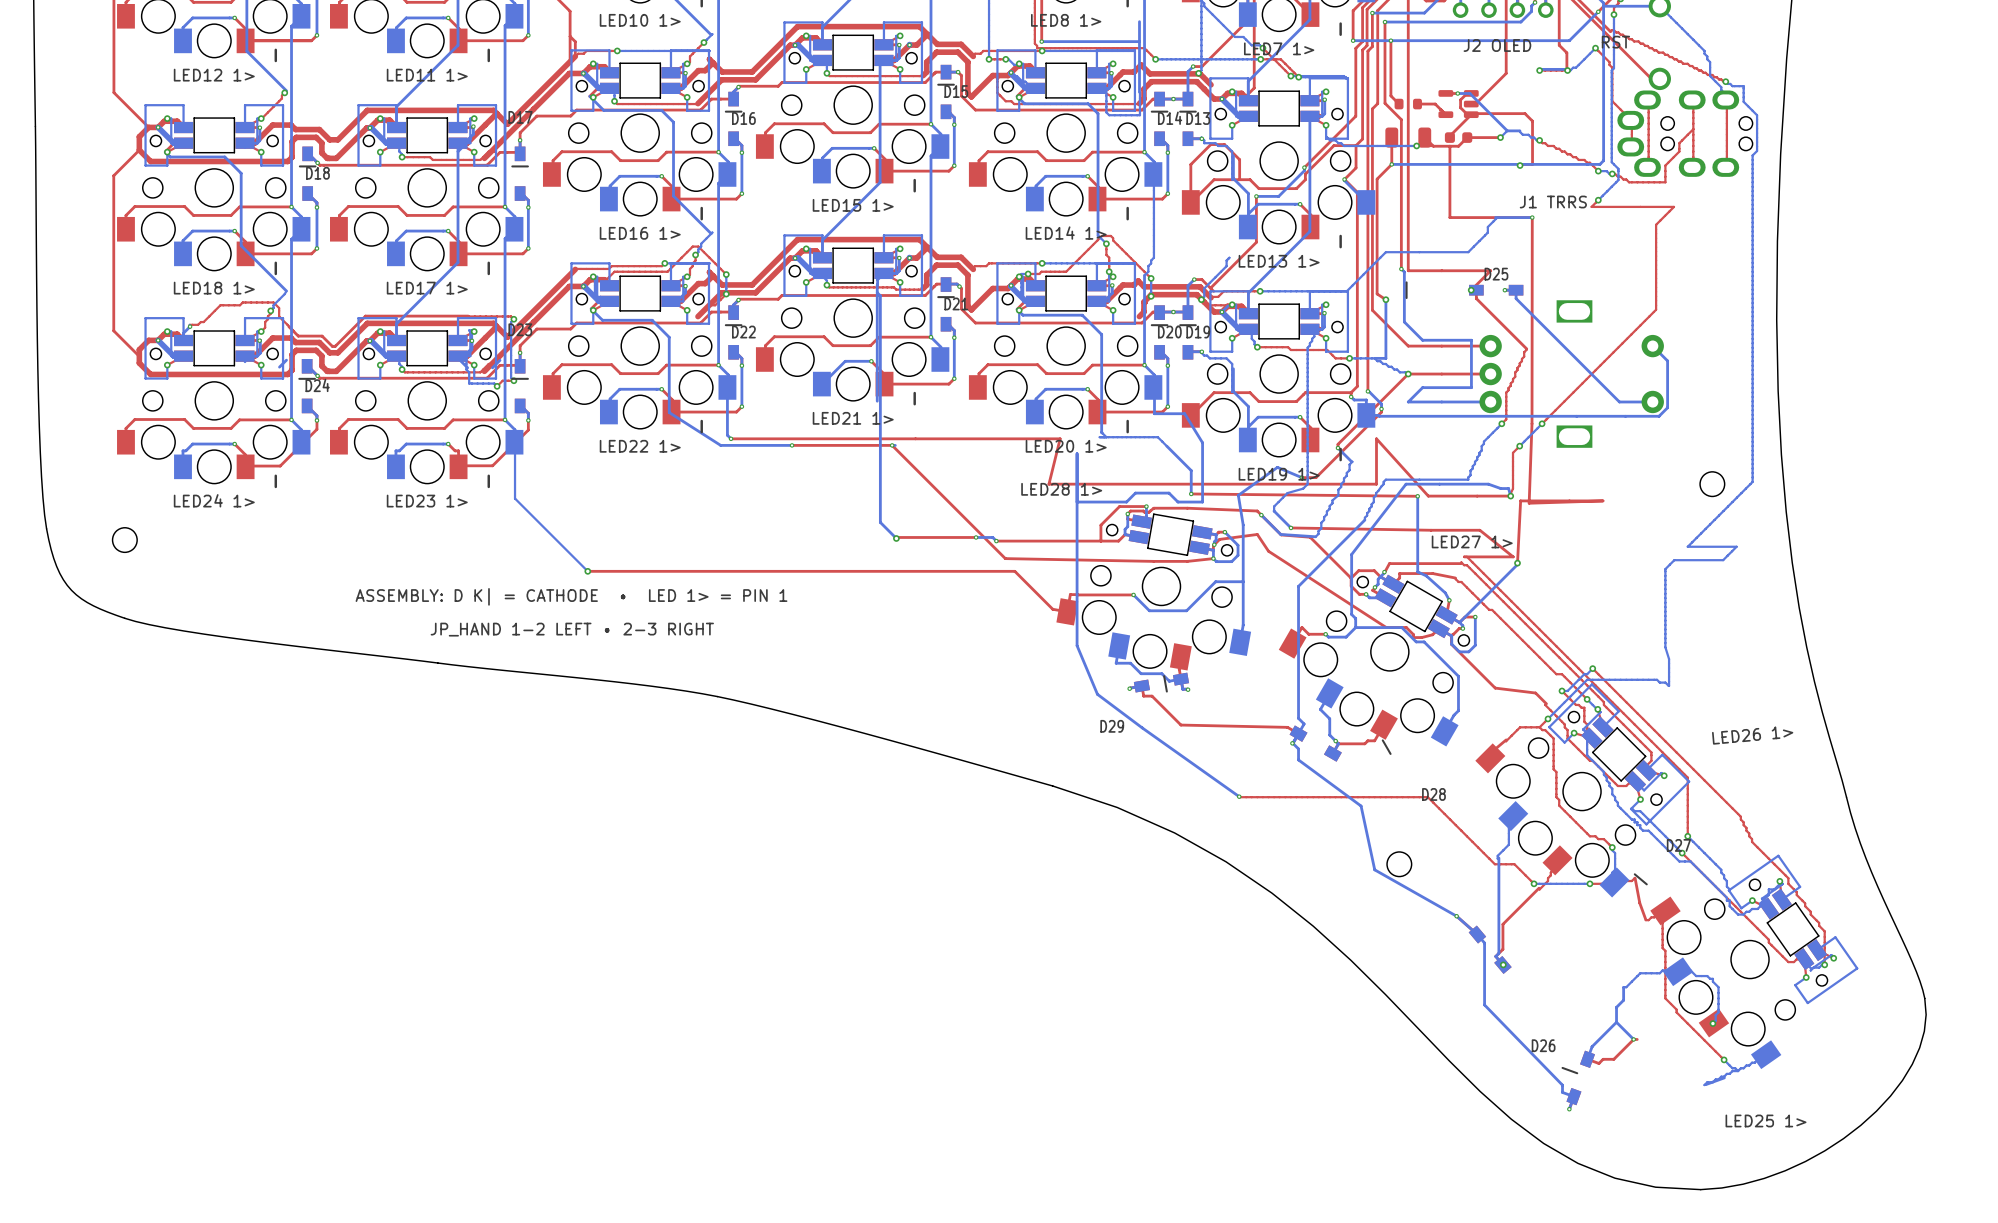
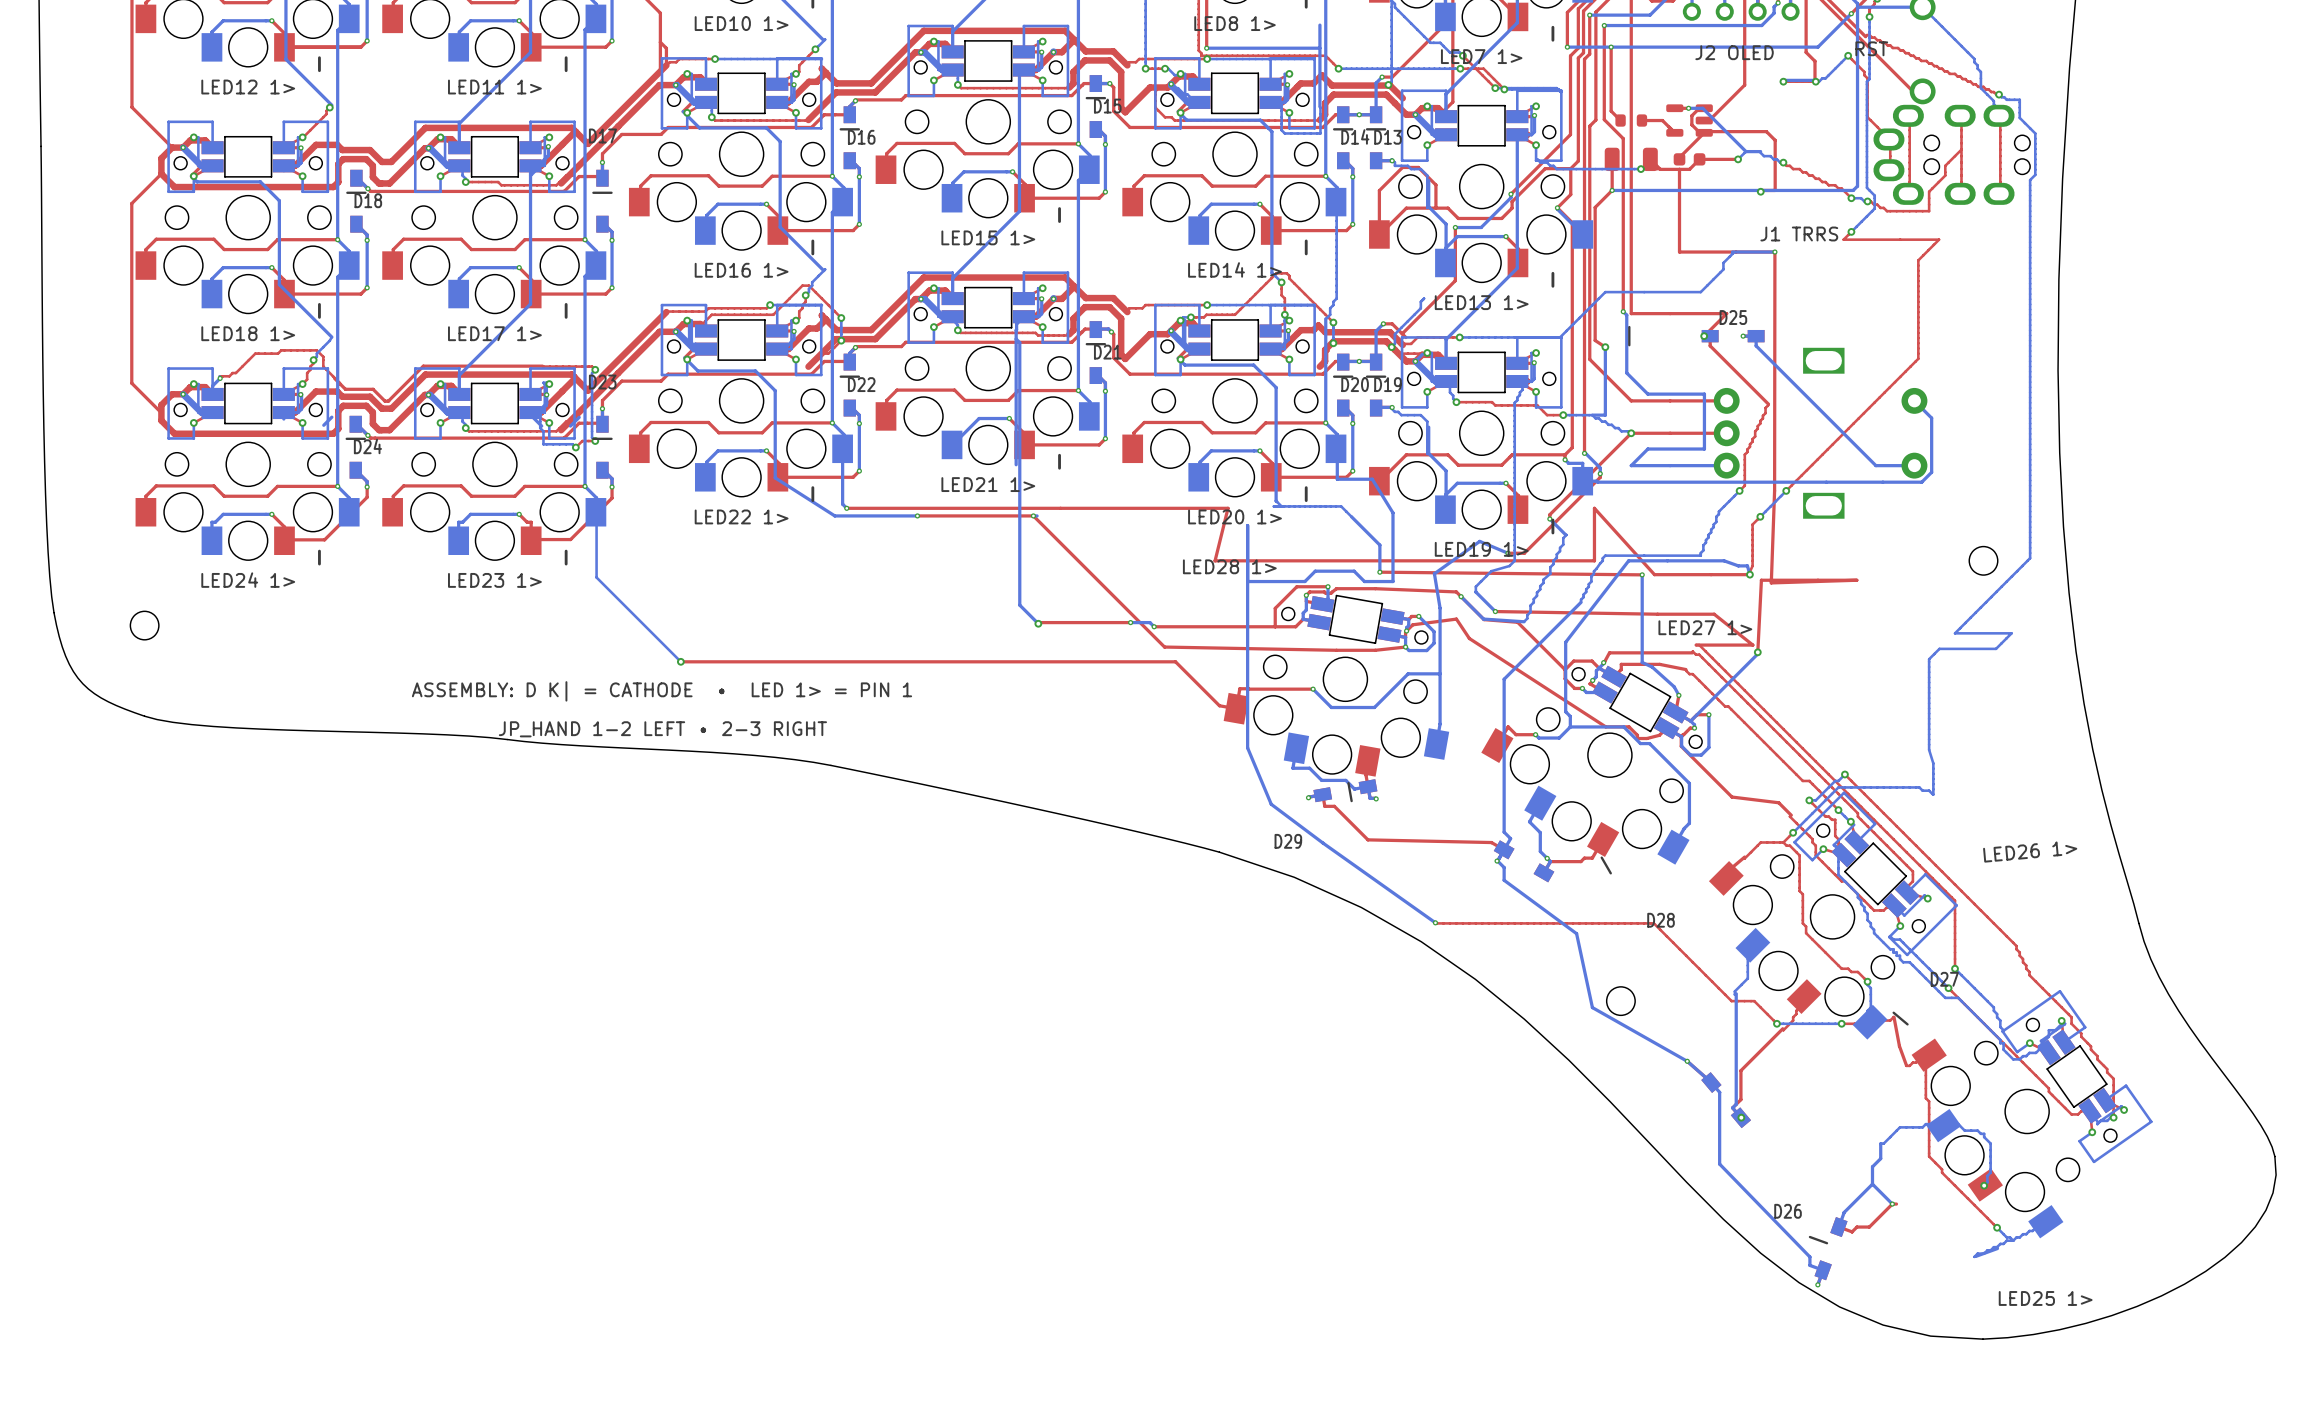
board edge: (124, 618) (165, 627) (248, 640) (633, 683) (717, 696) (914, 747) (1052, 786) (1117, 807) (1174, 832) (1226, 861) (1271, 893) (1313, 926) (1350, 960) (1480, 1091) (1511, 1119) (1543, 1143) (1577, 1163) (1615, 1178) (1655, 1187) (1700, 1189) (1721, 1187) (1764, 1178) (1805, 1161) (1843, 1138) (1876, 1111) (1902, 1080) (1912, 1064) (1924, 1031) (1926, 1014) (1922, 990) (1912, 961) (1865, 858) (1846, 797) -> (144, 716) (172, 722) (213, 726) (469, 736) (561, 744) (712, 752) (795, 759) (918, 783) (1140, 832) (1219, 852) (1294, 877) (1361, 907) (1421, 941) (1475, 979) (1524, 1019) (1568, 1060) (1723, 1219) (1760, 1253) (1799, 1282) (1839, 1306) (1883, 1325) (1930, 1336) (1983, 1339) (2033, 1334) (2085, 1323) (2137, 1306) (2184, 1284) (2224, 1257) (2255, 1226) (2265, 1210) (2273, 1192) (2276, 1175) (2272, 1147) (2253, 1113) (2200, 1043) (2168, 994) (2150, 959) (2138, 923)

